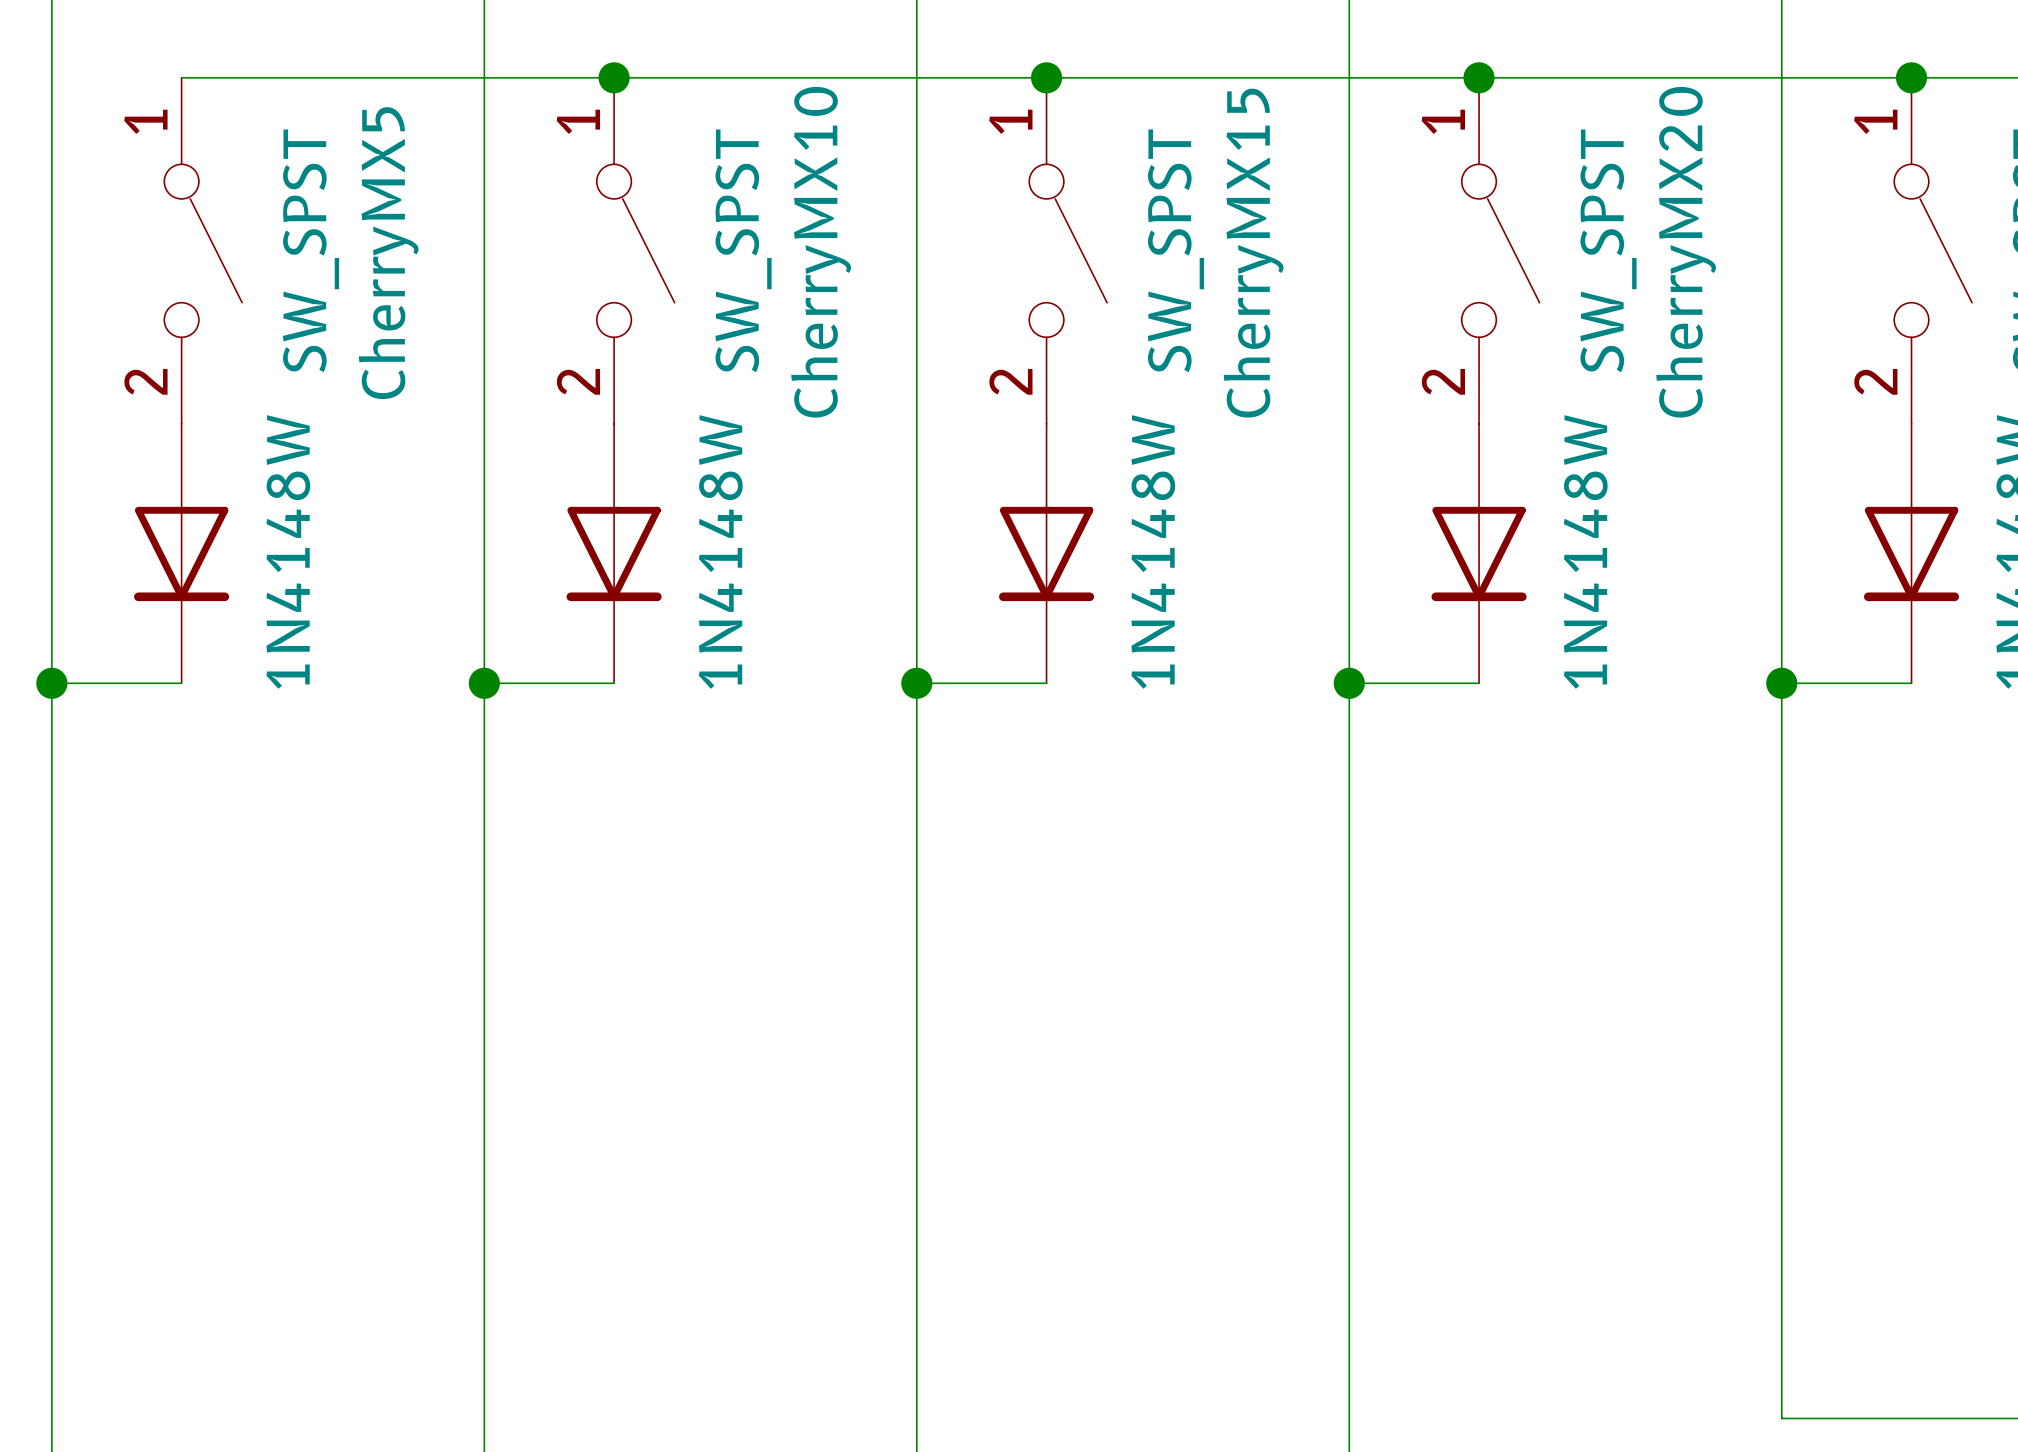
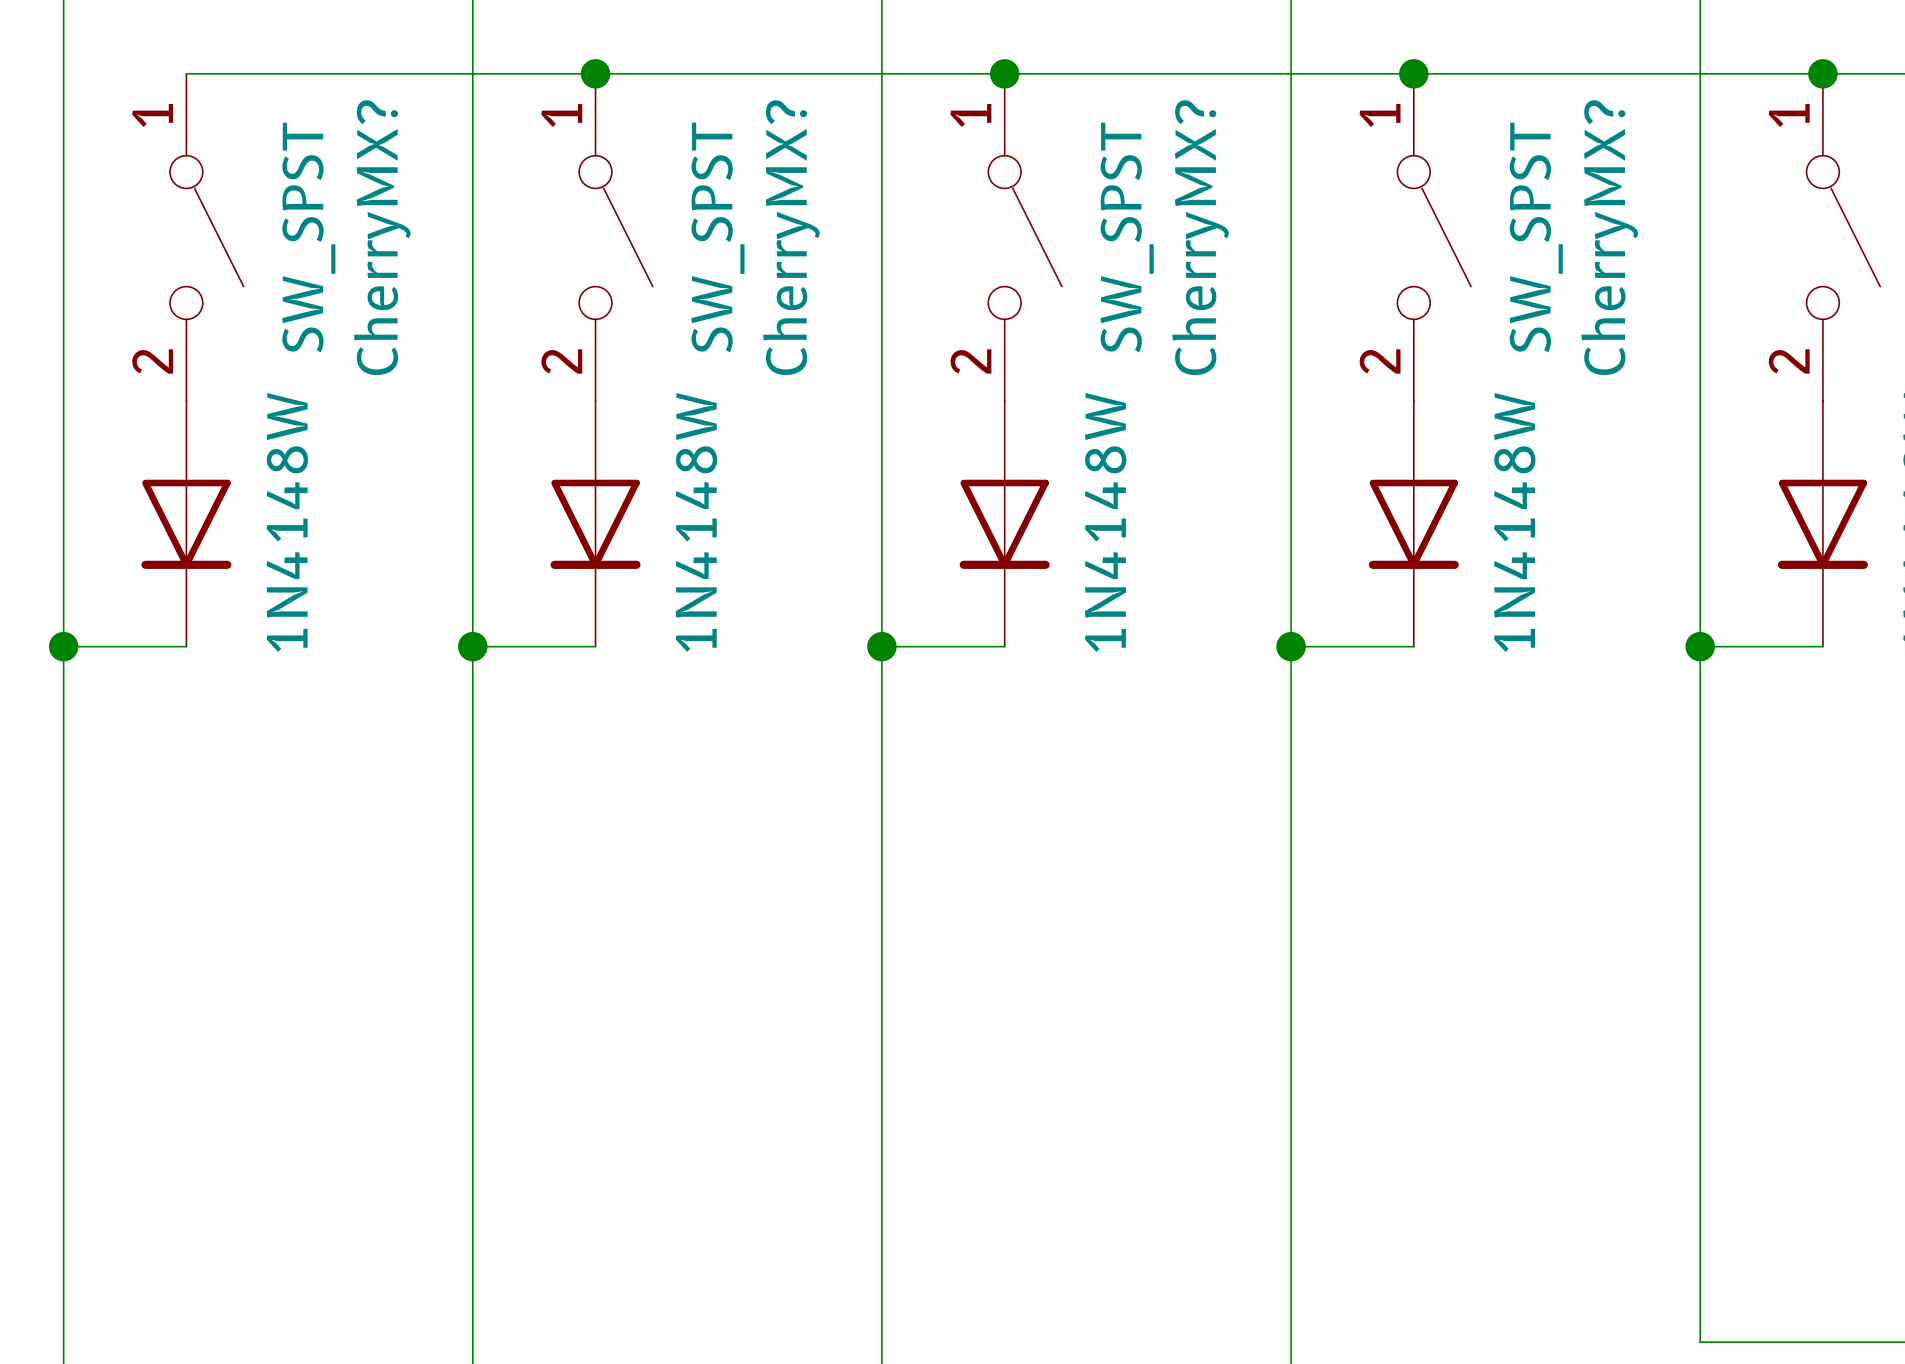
CherryMX10 name: CherryMX10 (821, 252) -> CherryMX? (791, 237)
CherryMX20 name: CherryMX20 (1686, 252) -> CherryMX? (1609, 237)
CherryMX5 name: CherryMX5 (388, 253) -> CherryMX? (382, 237)
CherryMX15 name: CherryMX15 (1253, 253) -> CherryMX? (1200, 237)

